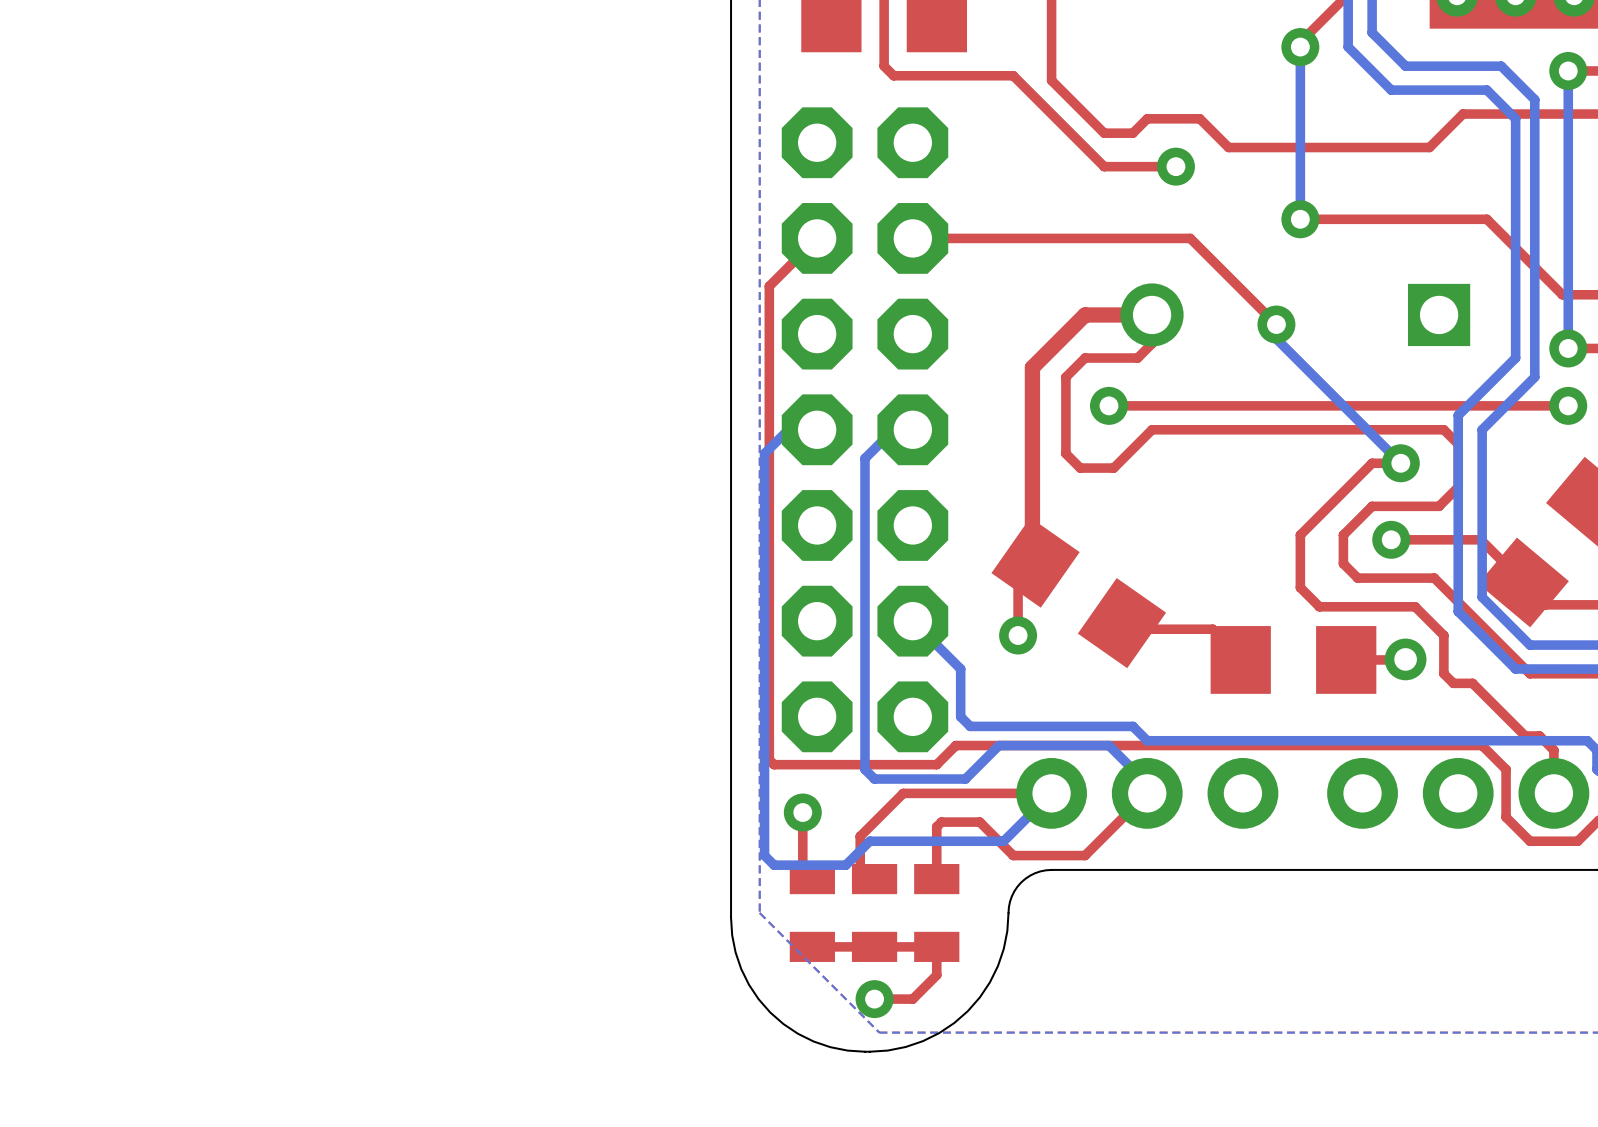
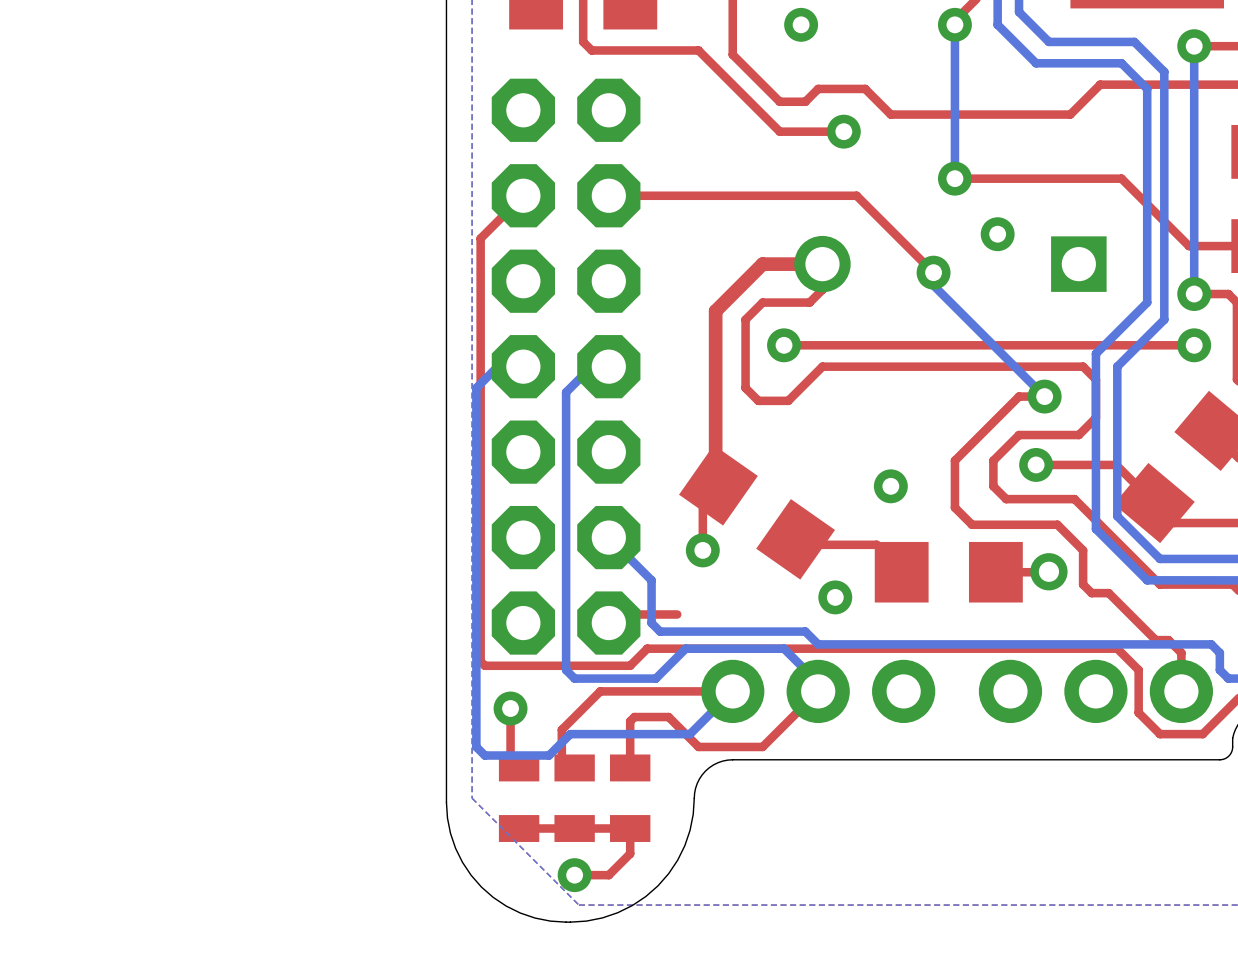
via: none -> (801, 24)
via: none -> (997, 234)
via: none -> (890, 486)
via: none -> (835, 597)
top track: none -> (677, 614) (617, 614) (608, 623)

